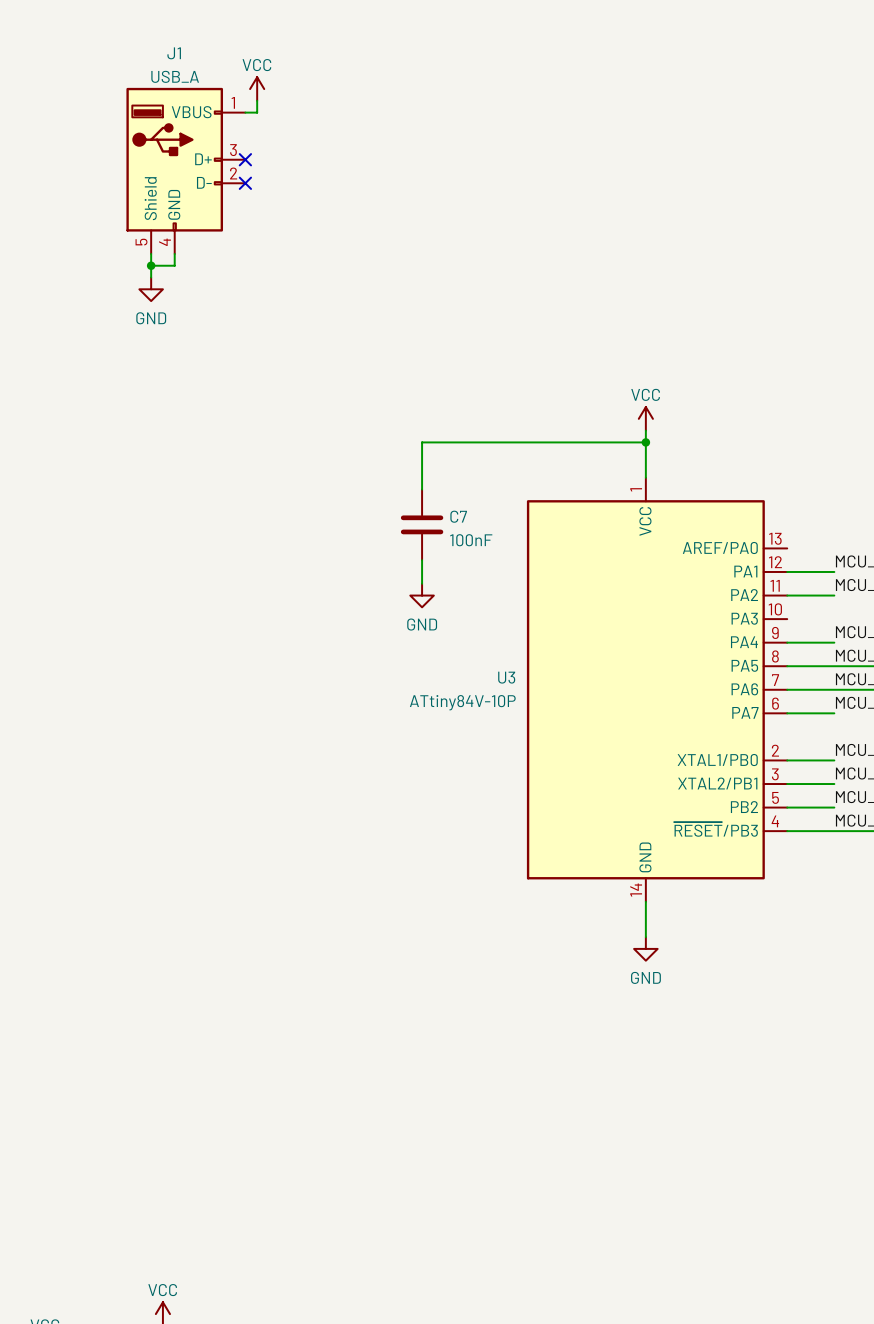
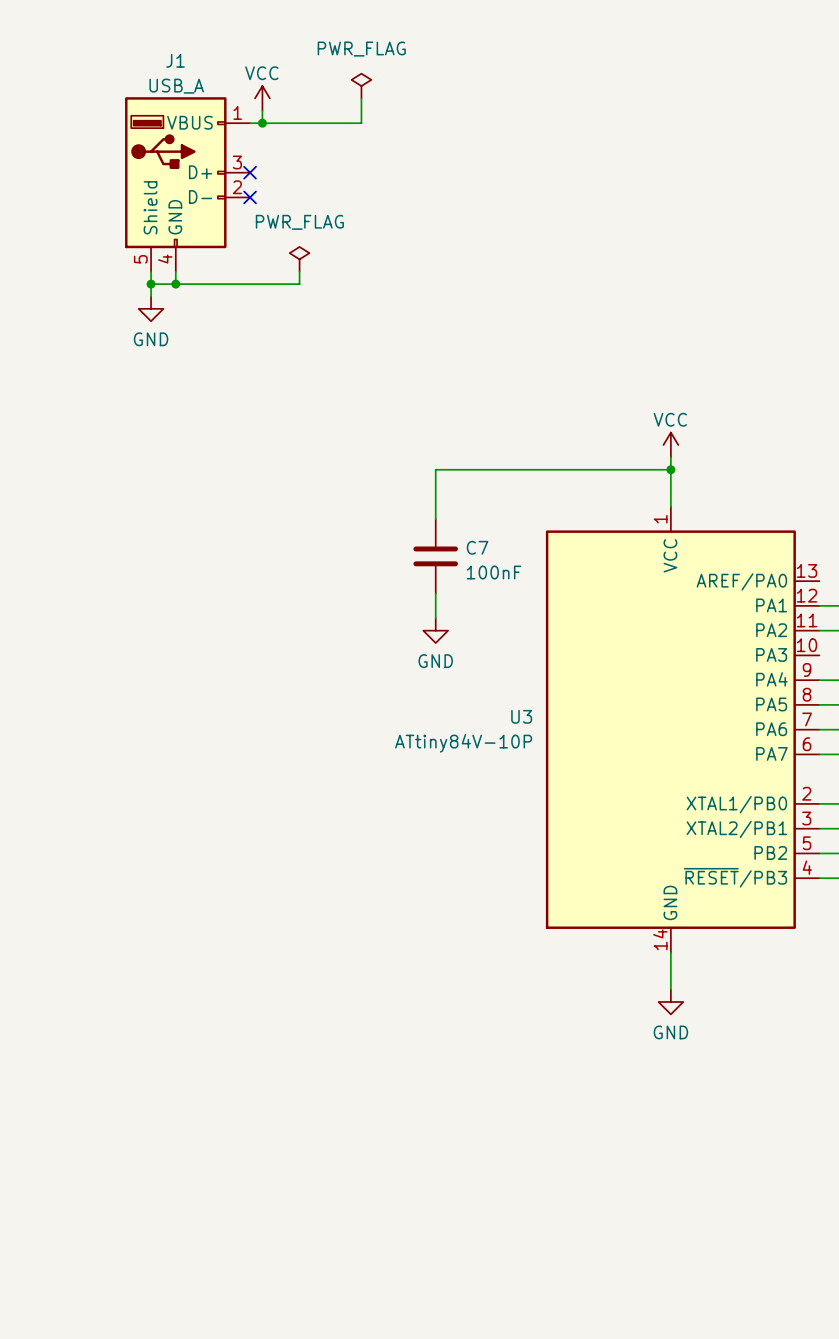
power symbol: none -> PWR_FLAG (361, 86)
wire: none -> (361, 98) (361, 123) (262, 123)
junction: none -> (262, 123)
power symbol: none -> PWR_FLAG (299, 259)
wire: none -> (299, 271) (299, 284) (175, 284)
junction: none -> (175, 284)

